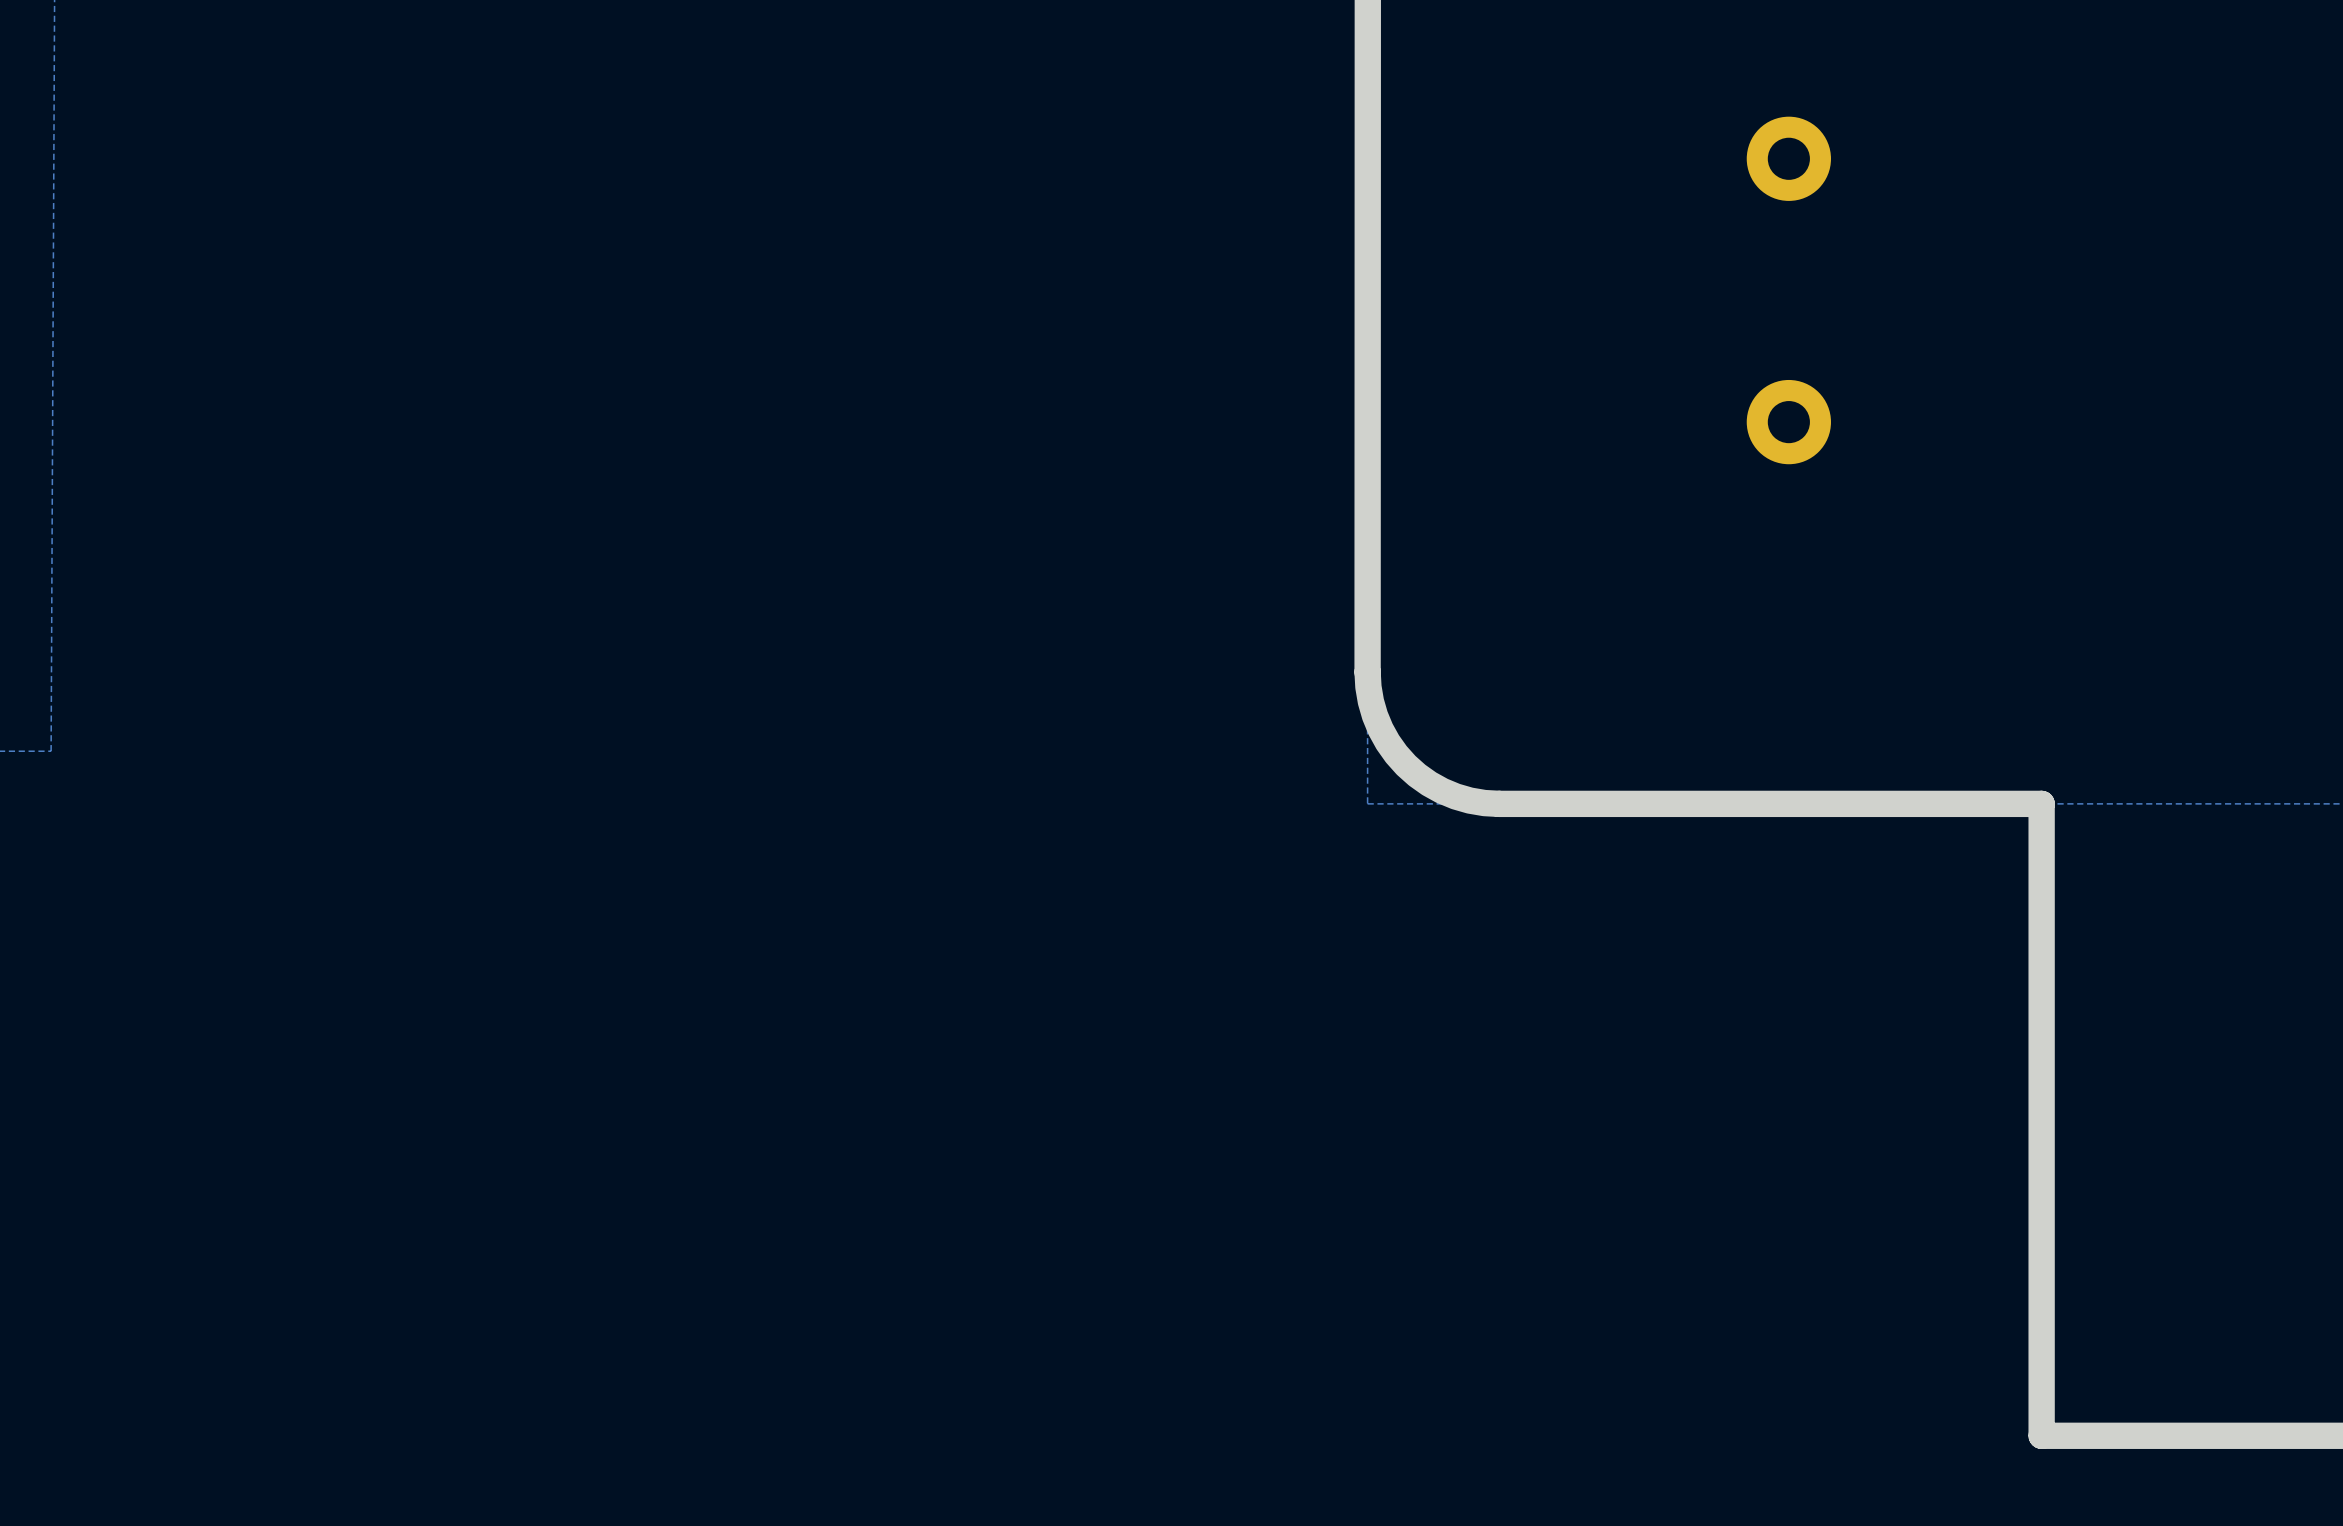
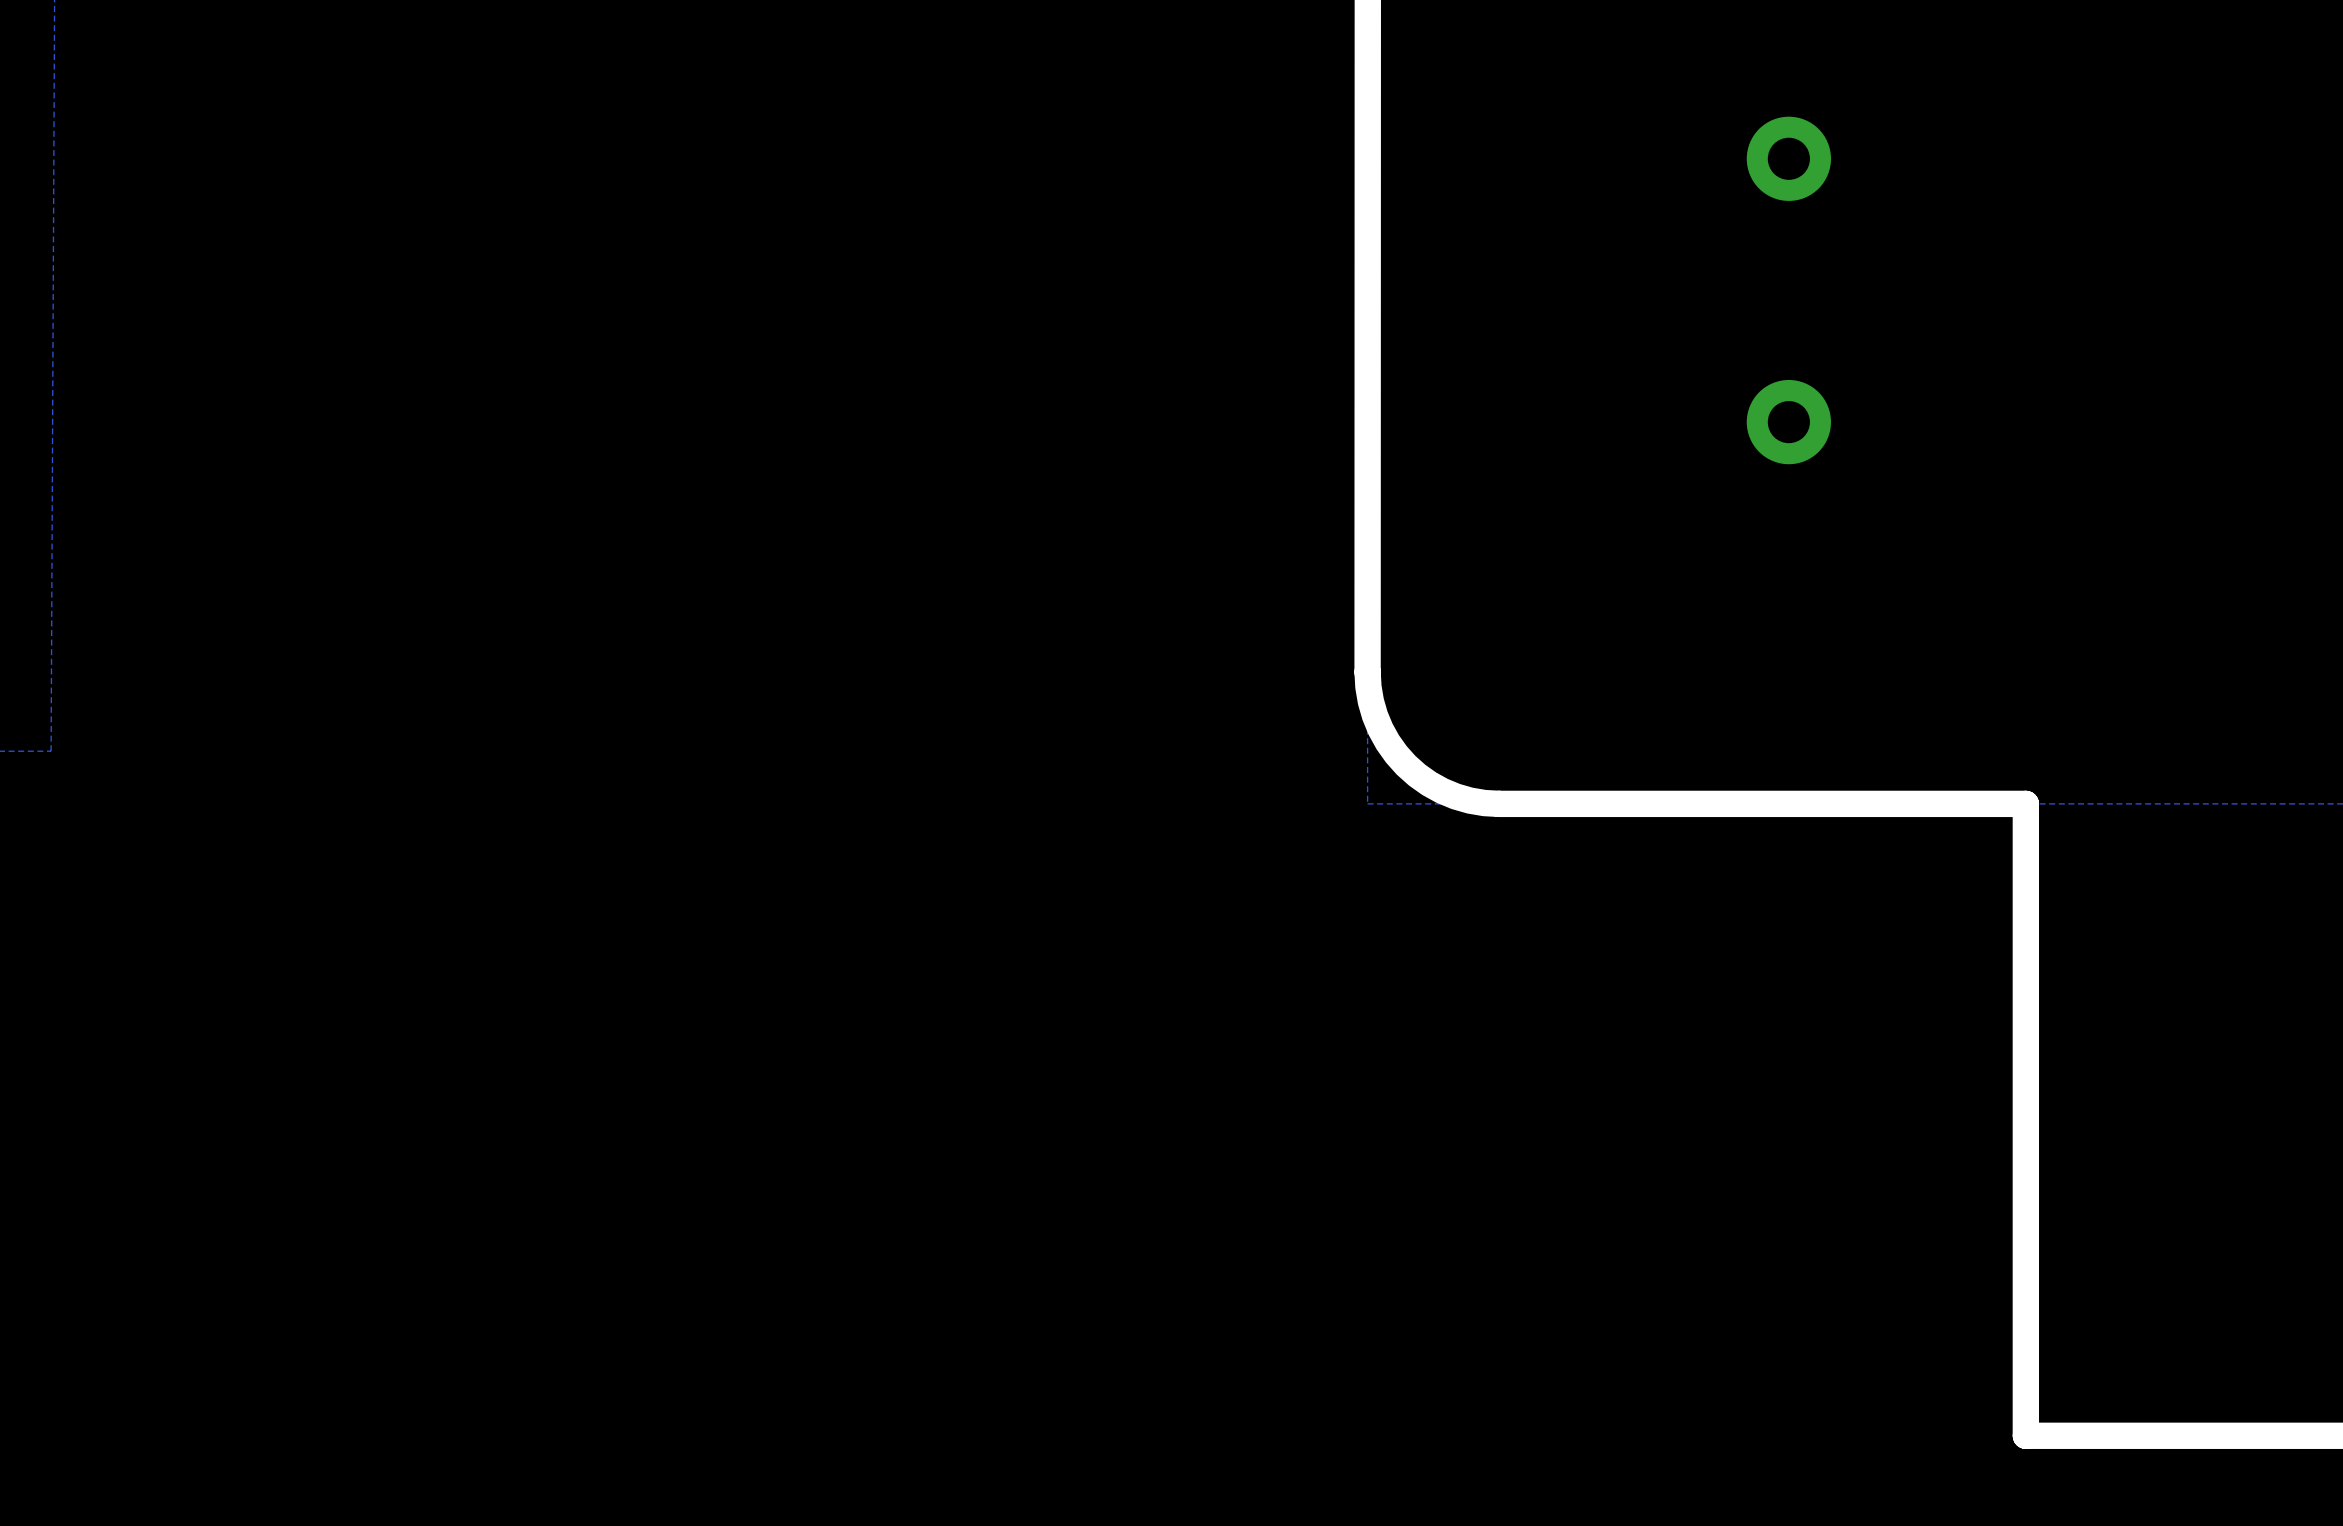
board edge: (2025, 803) (2041, 803) (2041, 1435) -> (2025, 803) (2025, 1435) (2041, 1435)

